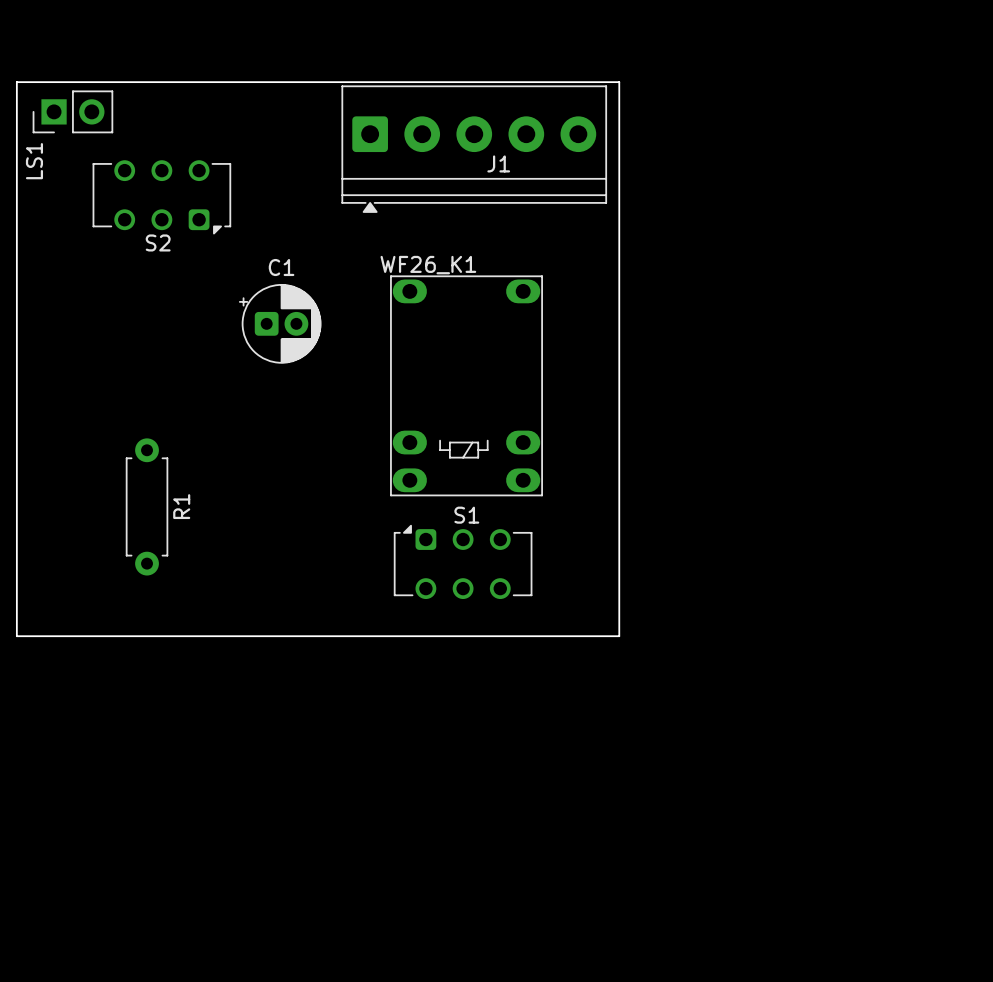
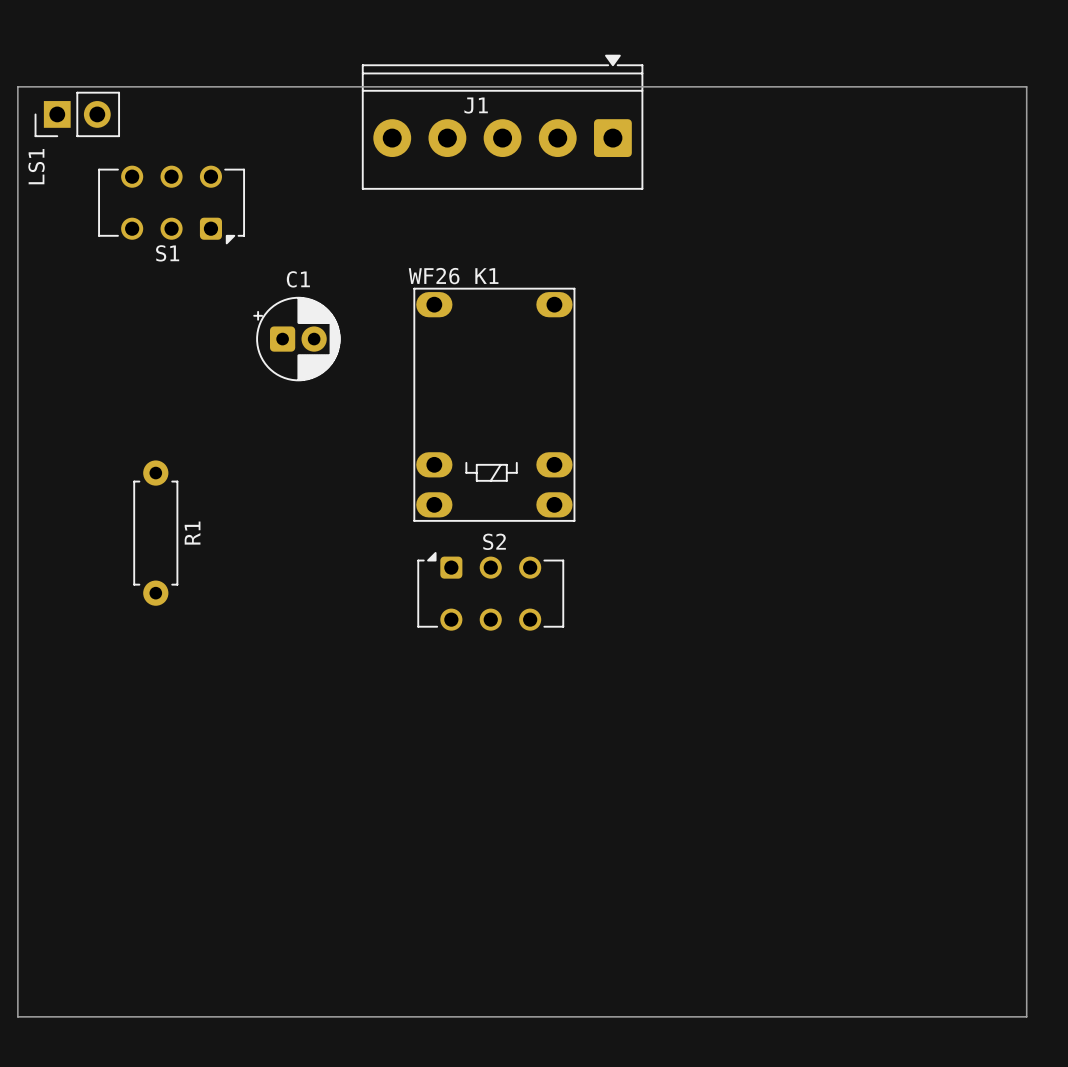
board edge: (16, 85) (16, 82) (619, 82) (619, 636) (16, 636) -> (17, 86) (1026, 86) (1026, 1016) (17, 1016) (17, 670)
J1 rotation: 0° (474, 149) -> 180° (502, 122)
S2 name: S2 (158, 242) -> S1 (167, 253)
S1 name: S1 (466, 515) -> S2 (494, 541)

